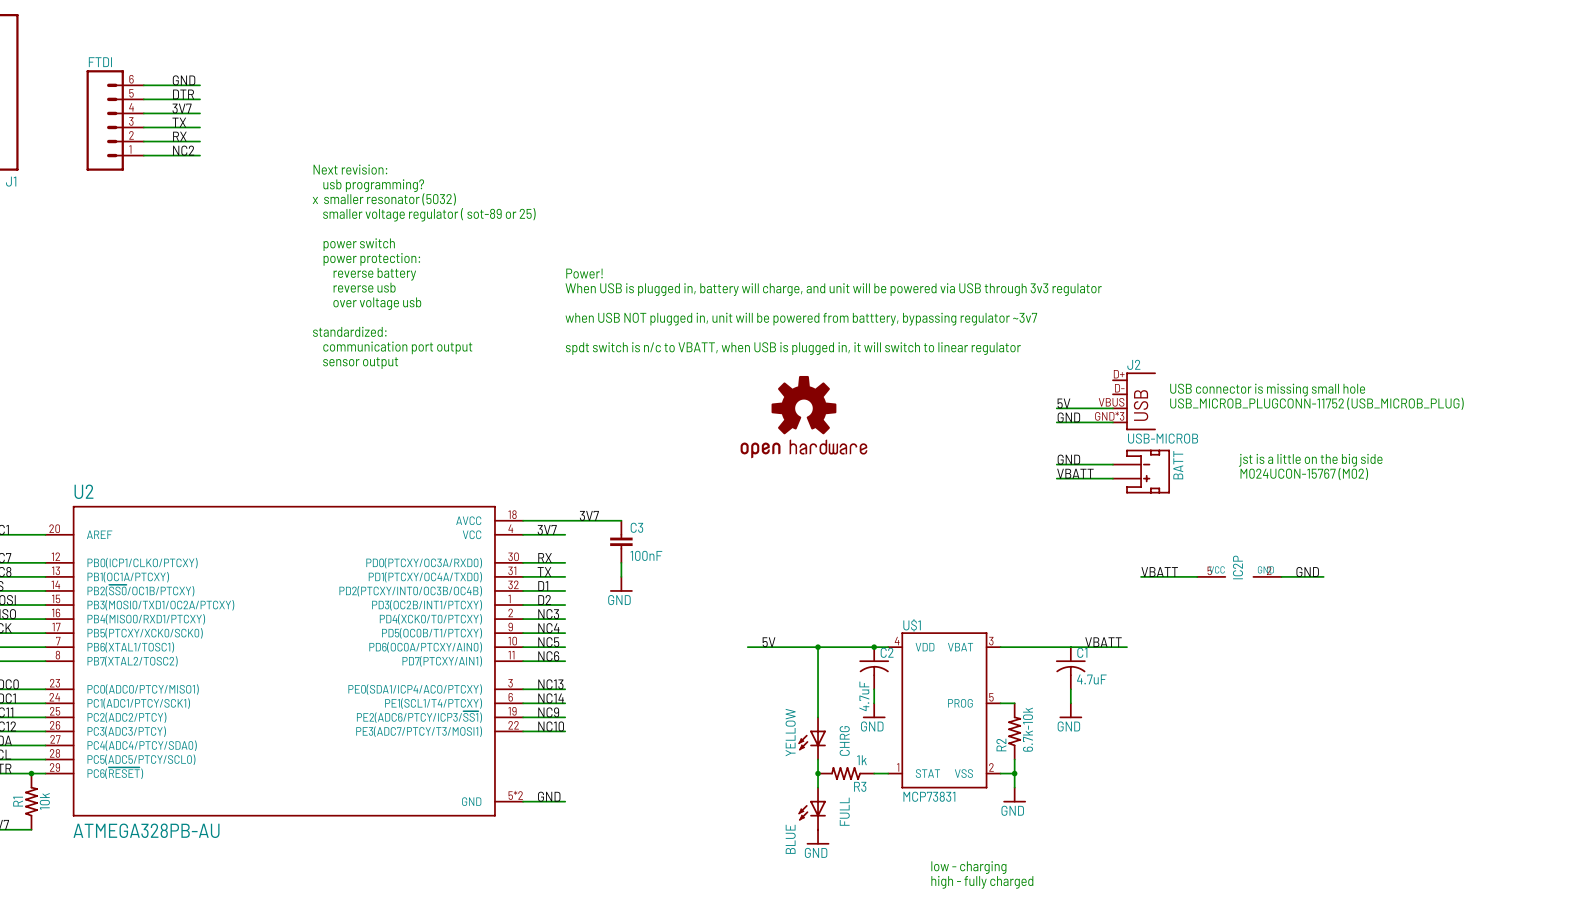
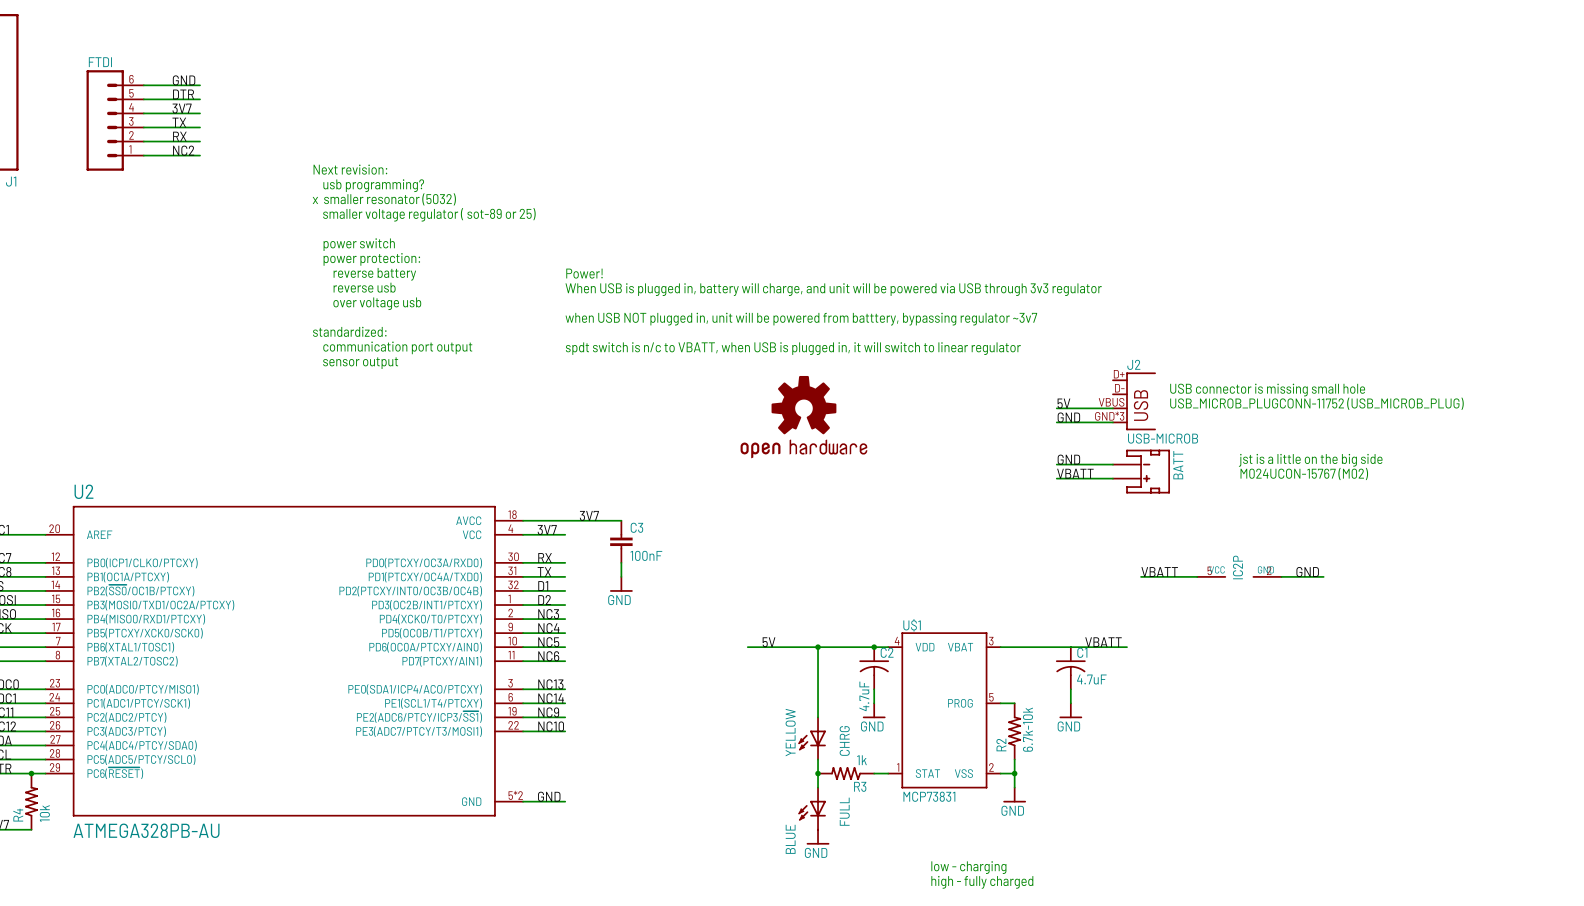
R1: 10k (31, 801) -> none
R4: none -> 10k (31, 801)

